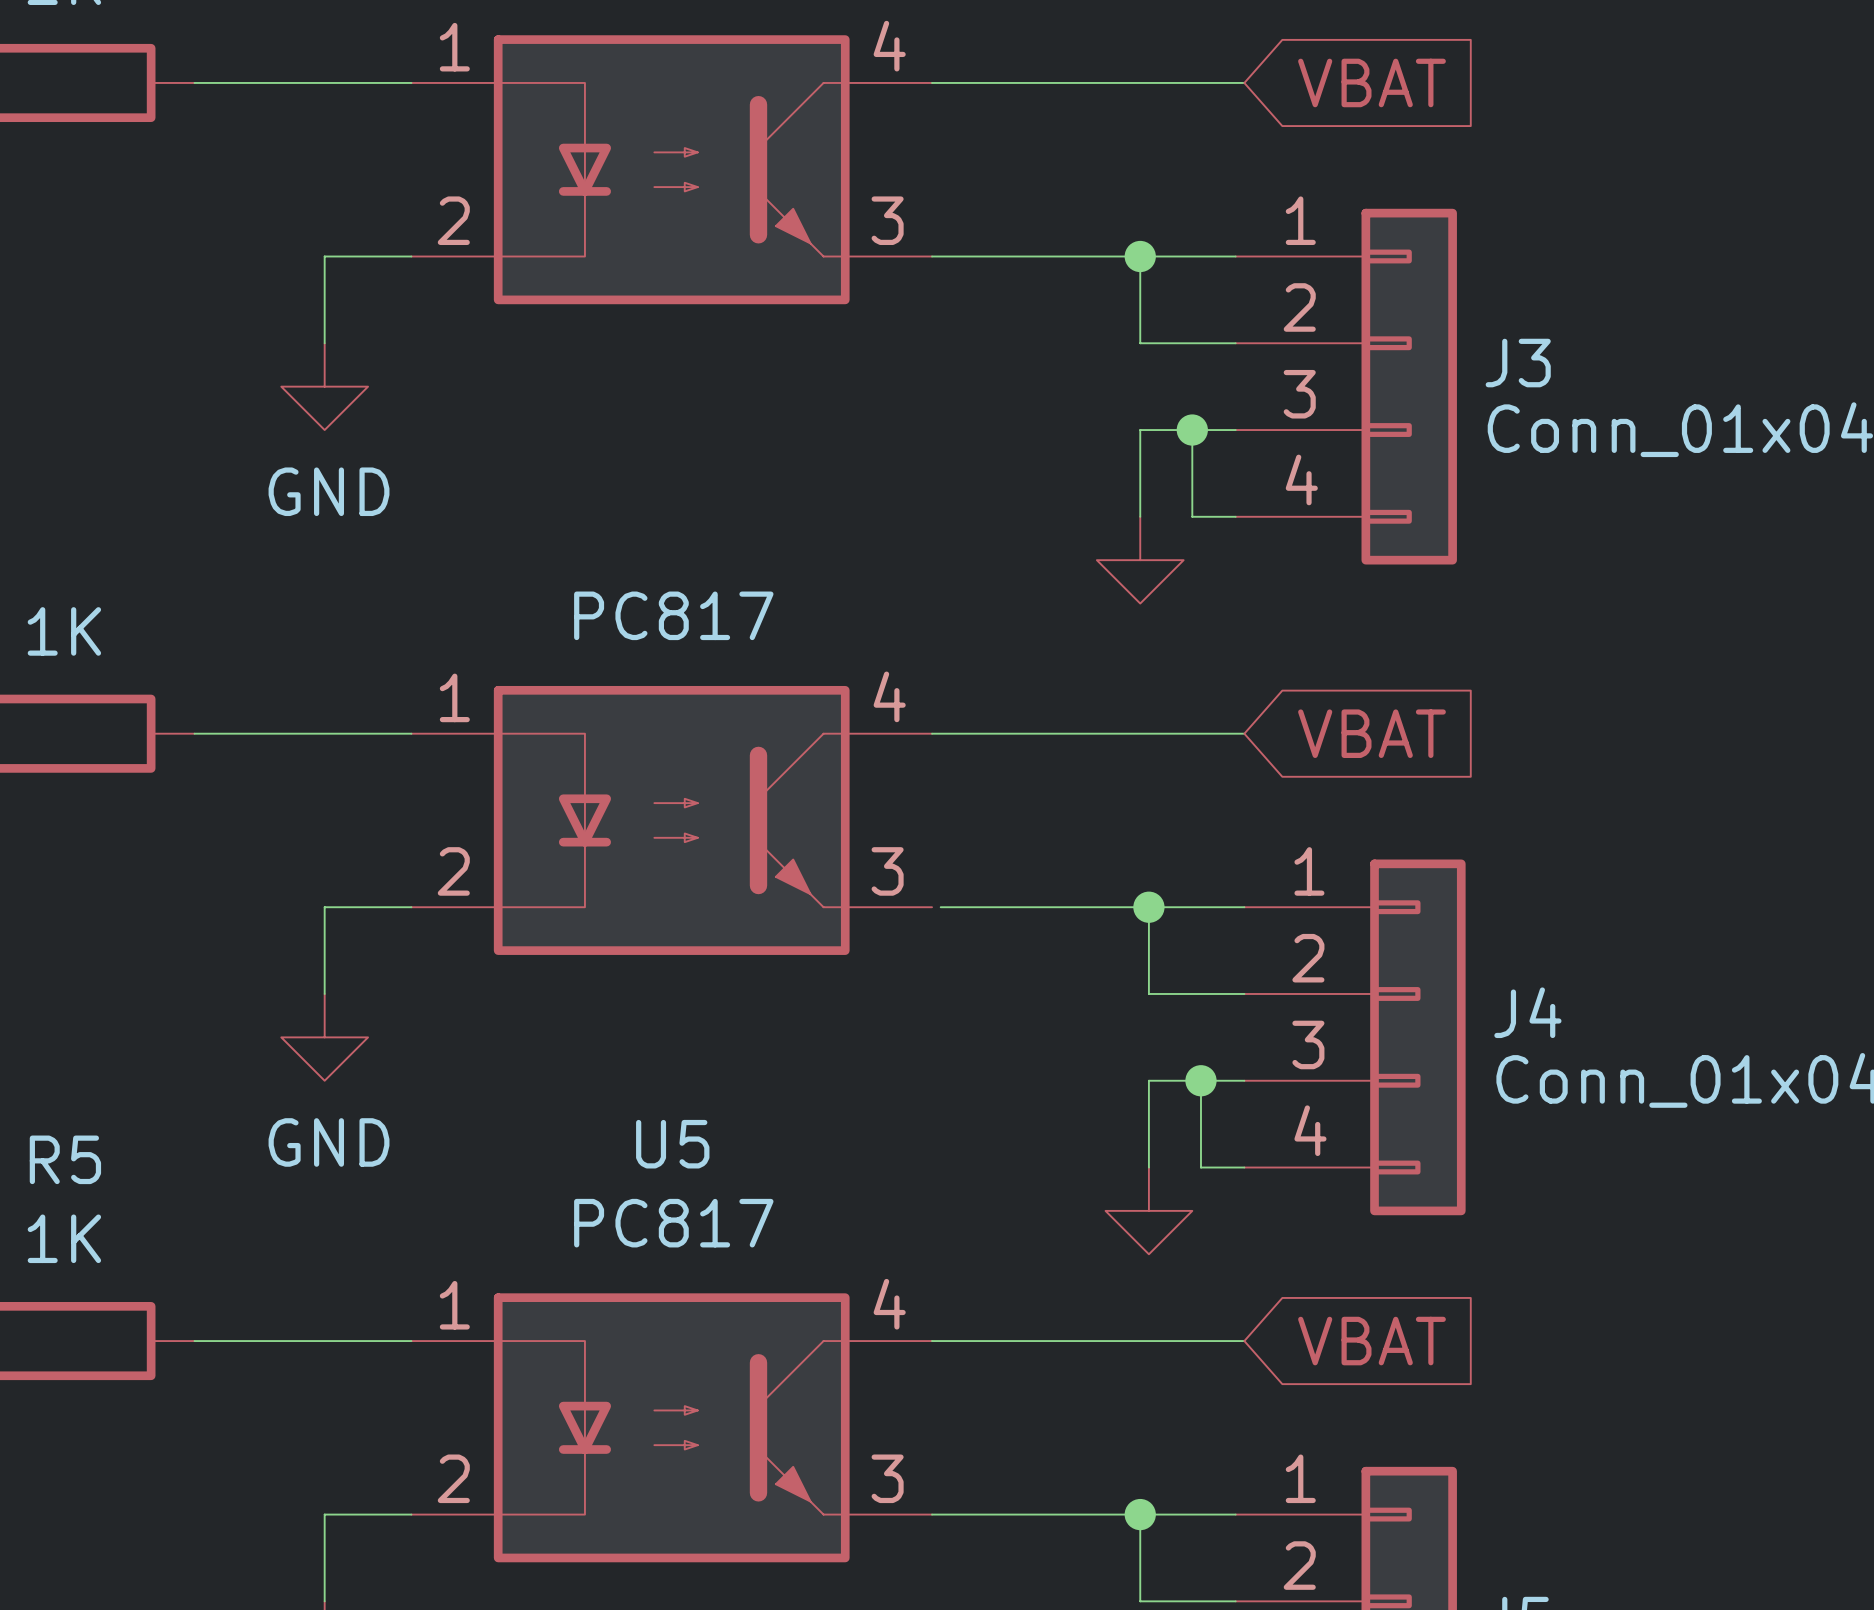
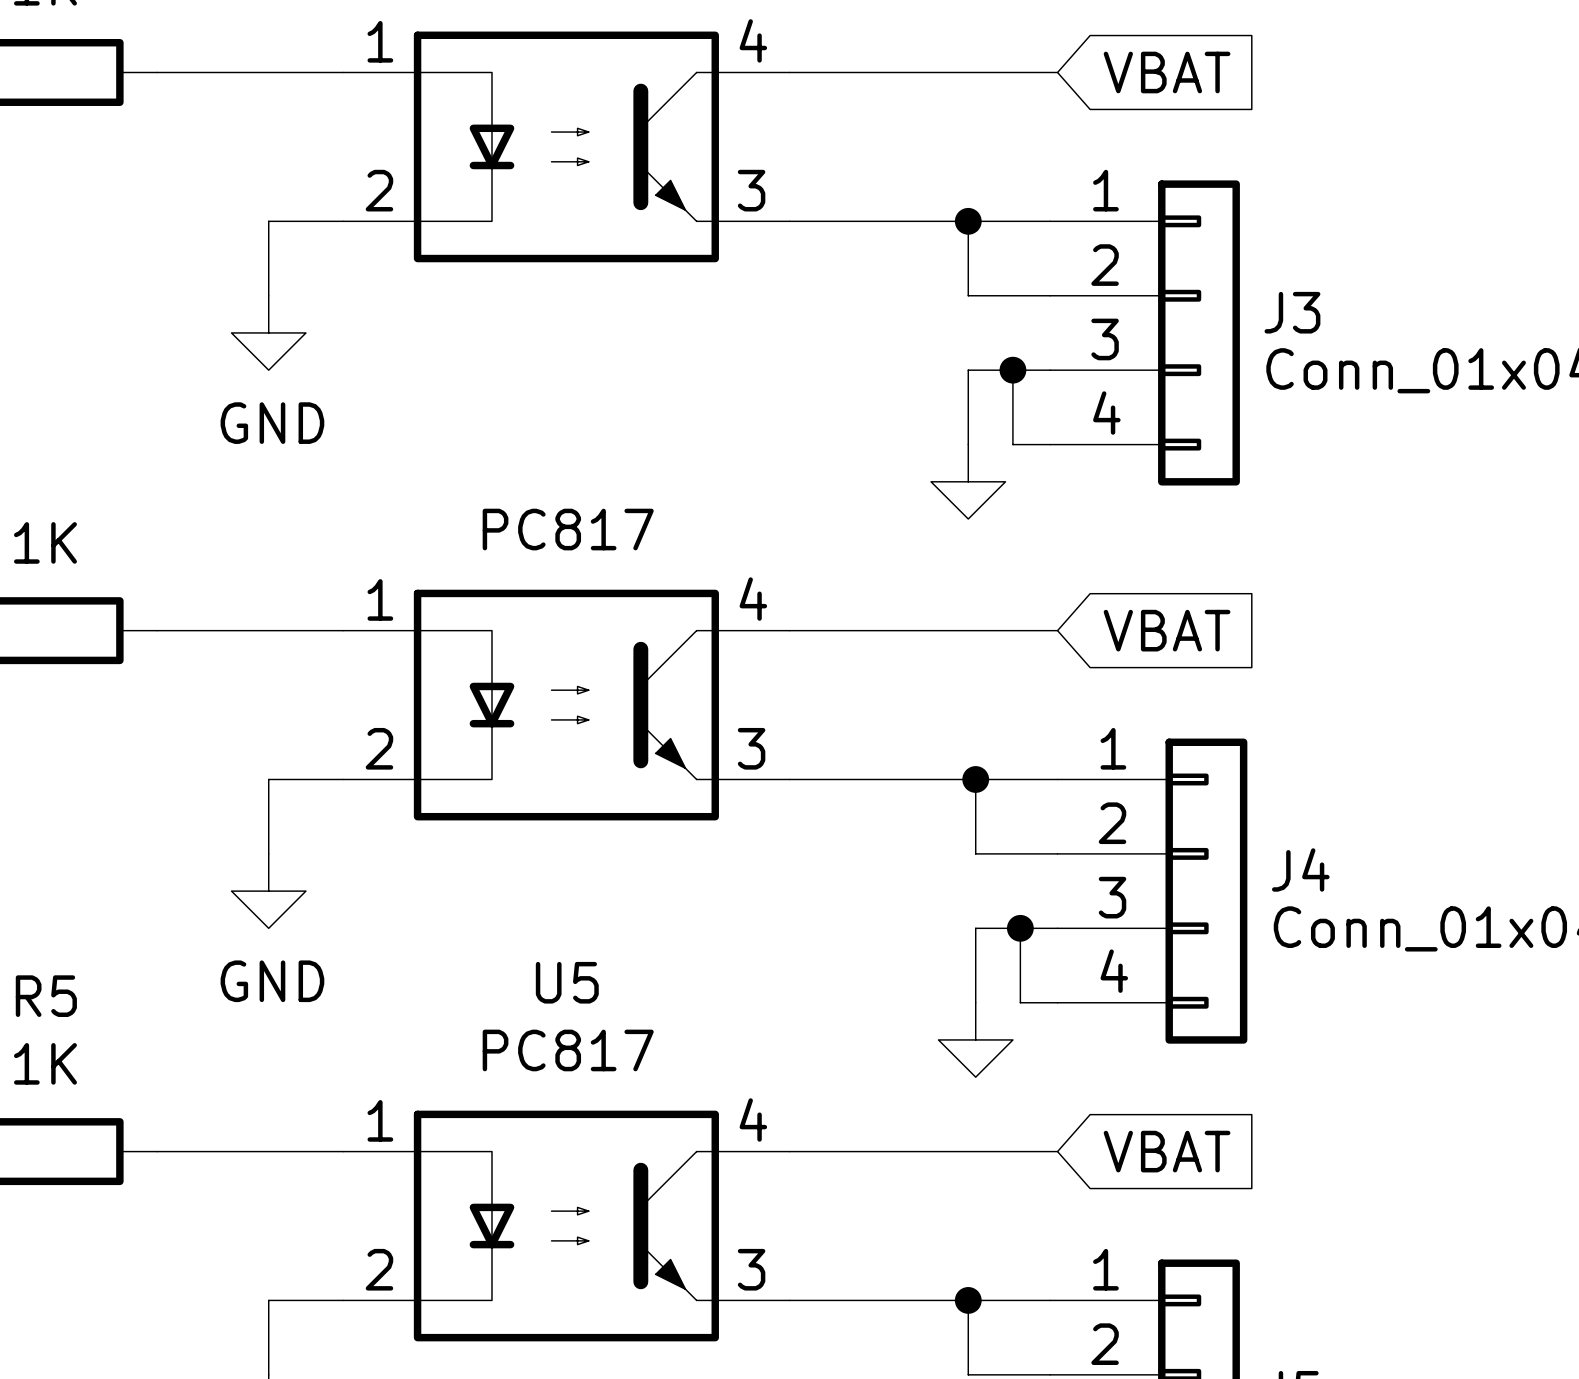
wire: none -> (789, 779) (797, 779)

